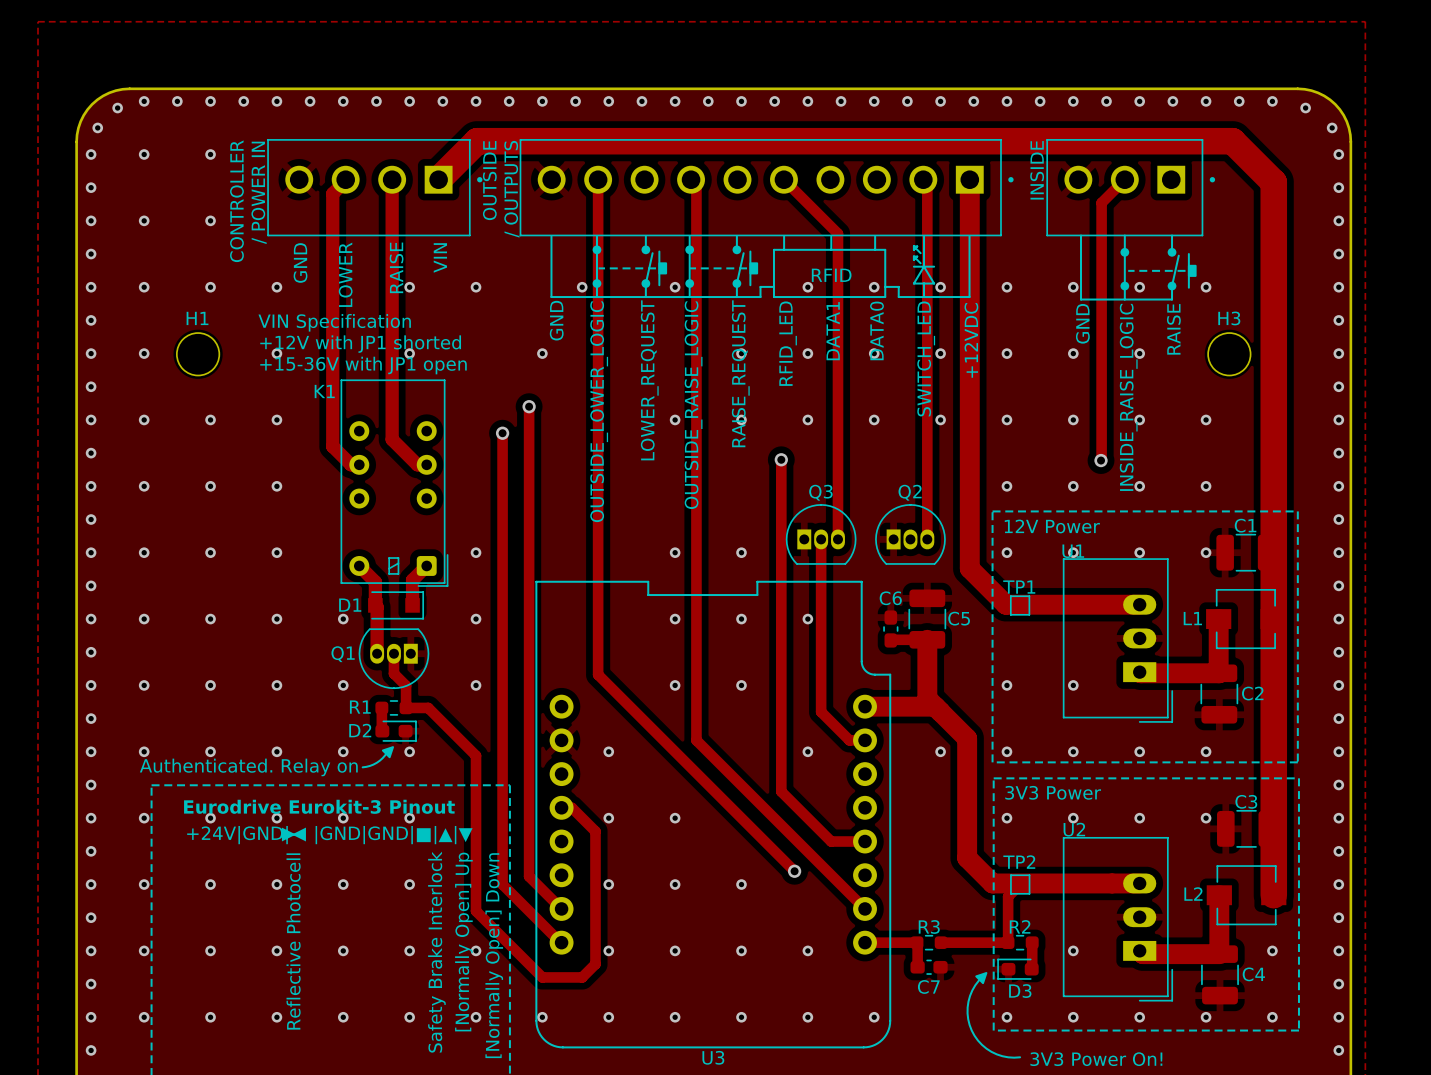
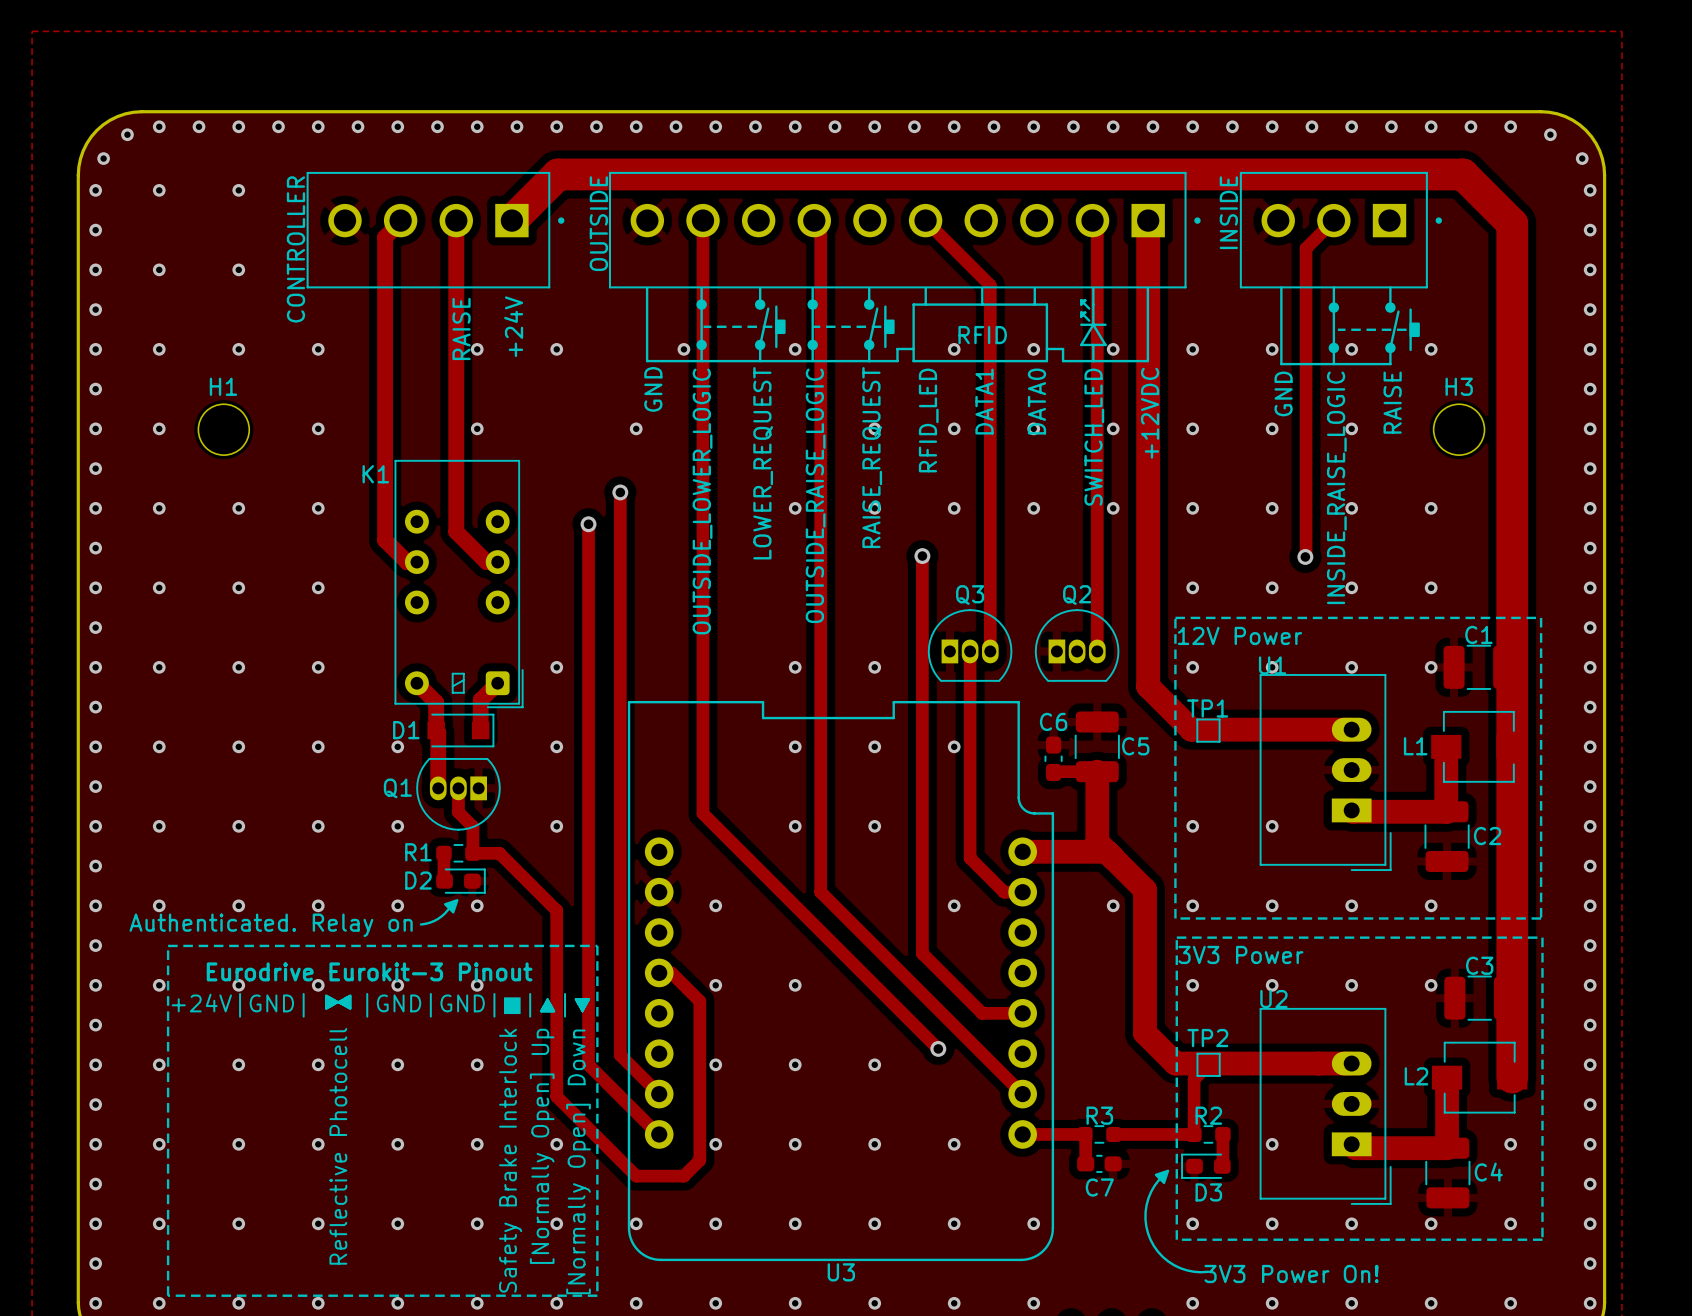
text: OUTSIDE (489, 180) -> none
text: / OUTPUTS (511, 189) -> OUTSIDE (598, 223)
text: / POWER IN (259, 192) -> CONTROLLER (295, 249)
text: CONTROLLER (236, 201) -> none
text: VIN (440, 257) -> +24V (513, 326)
text: GND (300, 262) -> none
text: LOWER (345, 274) -> none
text: VIN Specification (334, 322) -> none
text: +12V with JP1 shorted (360, 344) -> none
text: +15-36V with JP1 open (363, 365) -> none

